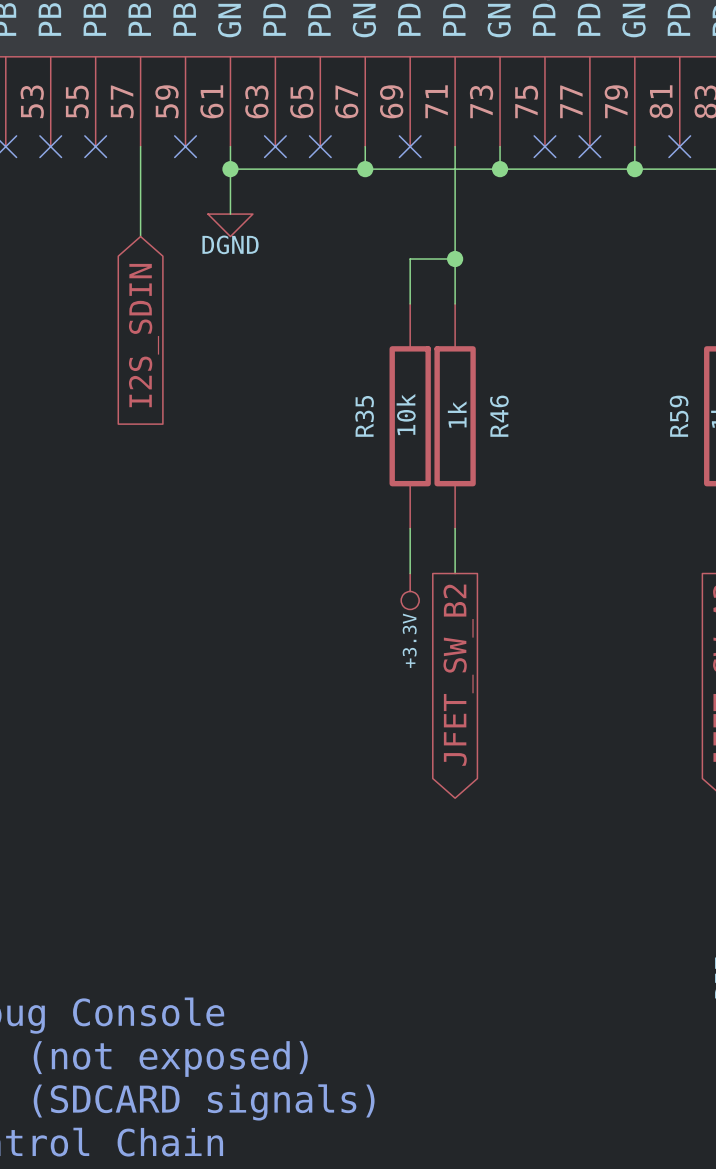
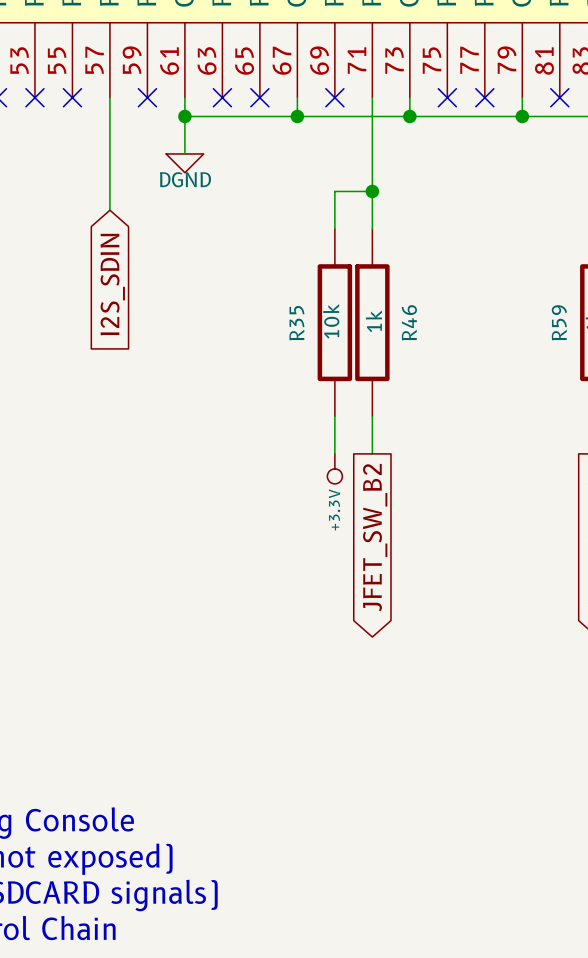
wire: none -> (109, 172) (109, 210)
global label position: I2S_SDIN (144, 335) -> I2S_SDIN (112, 284)

